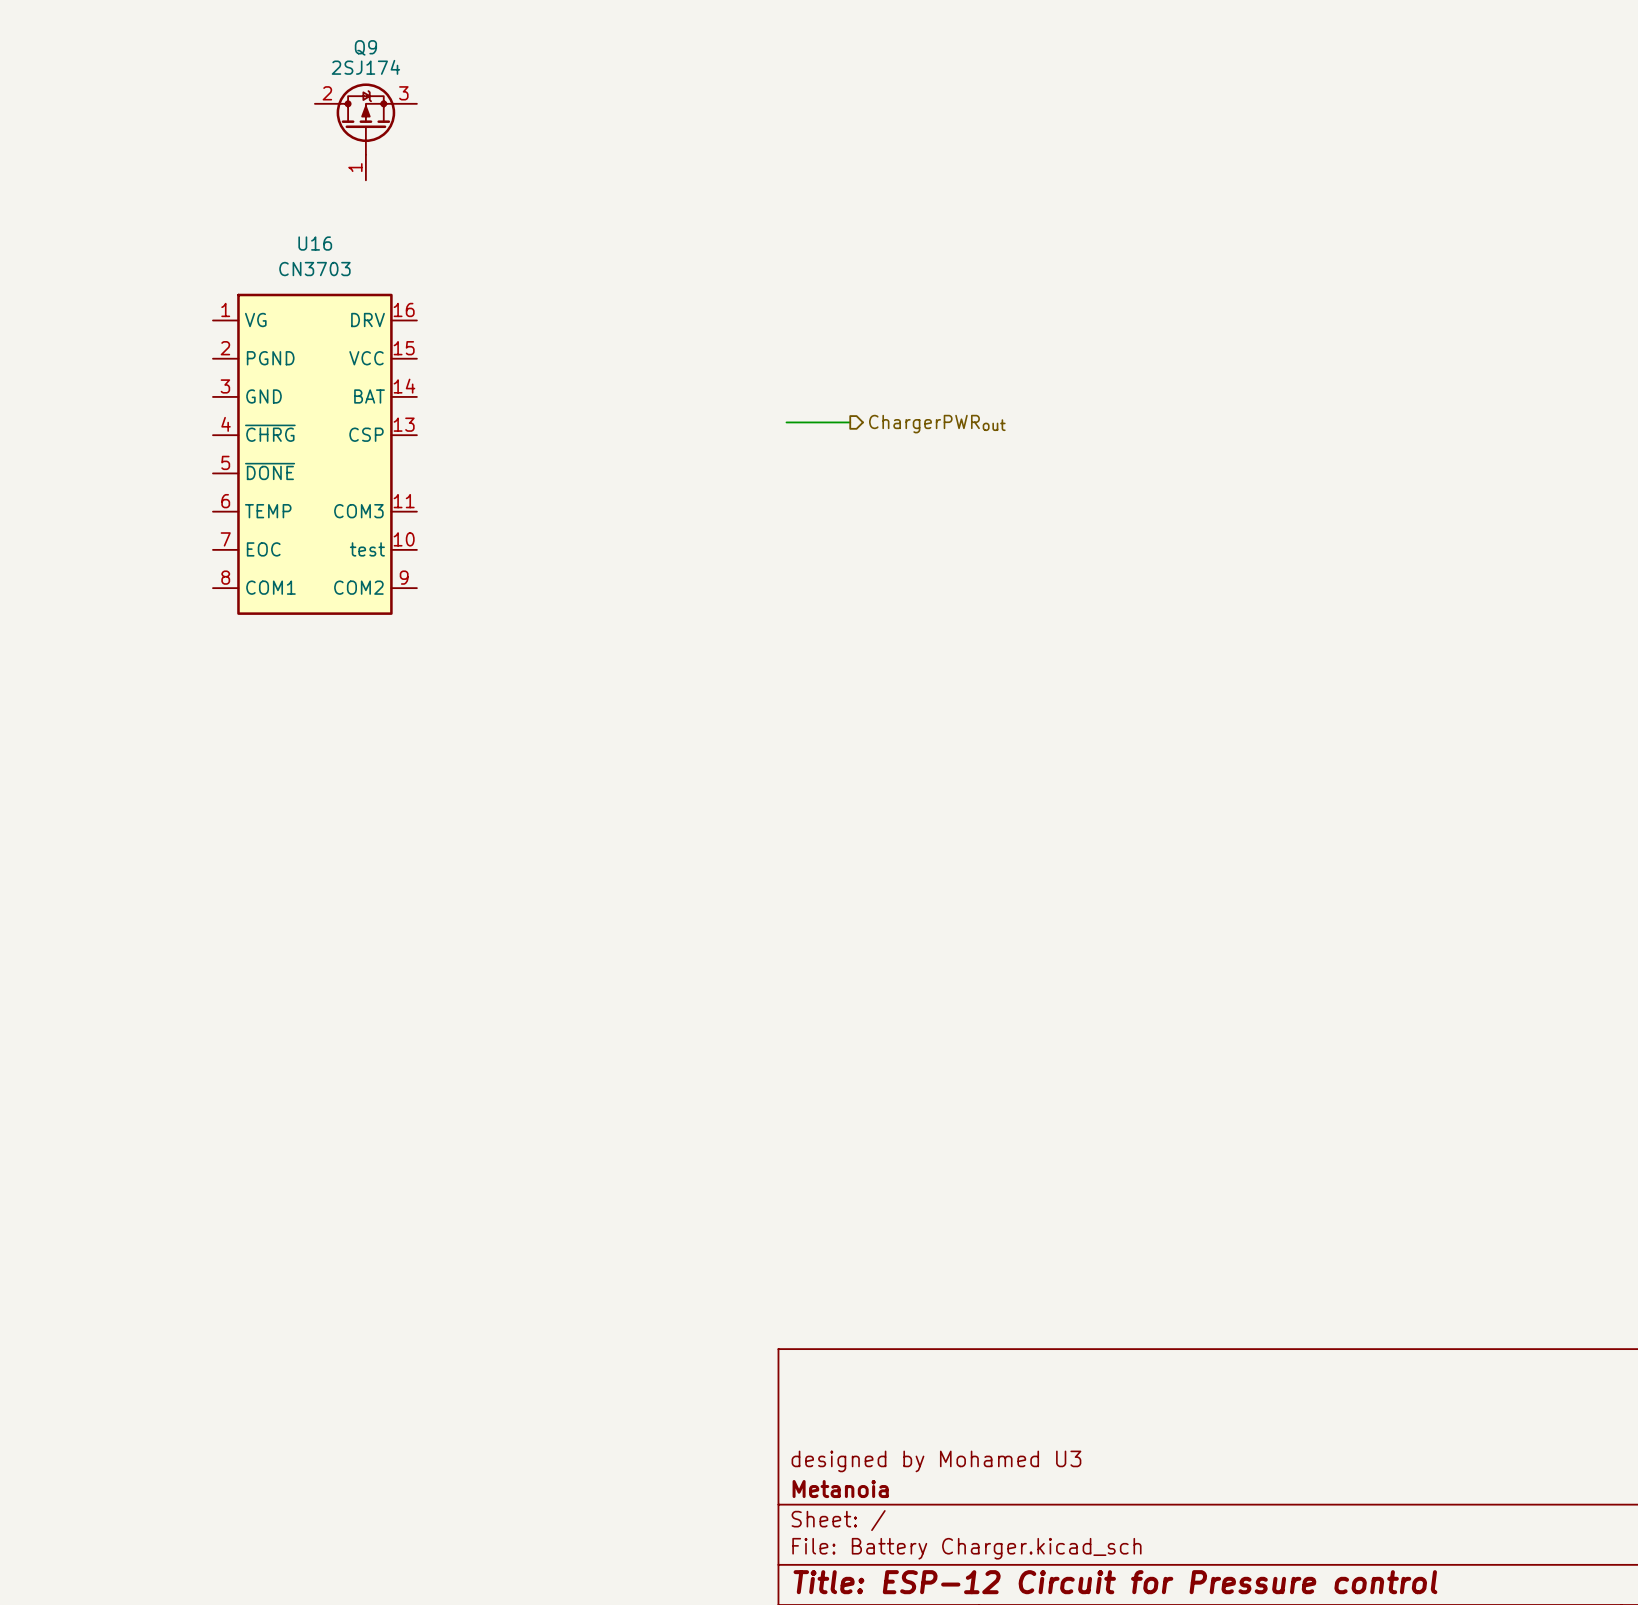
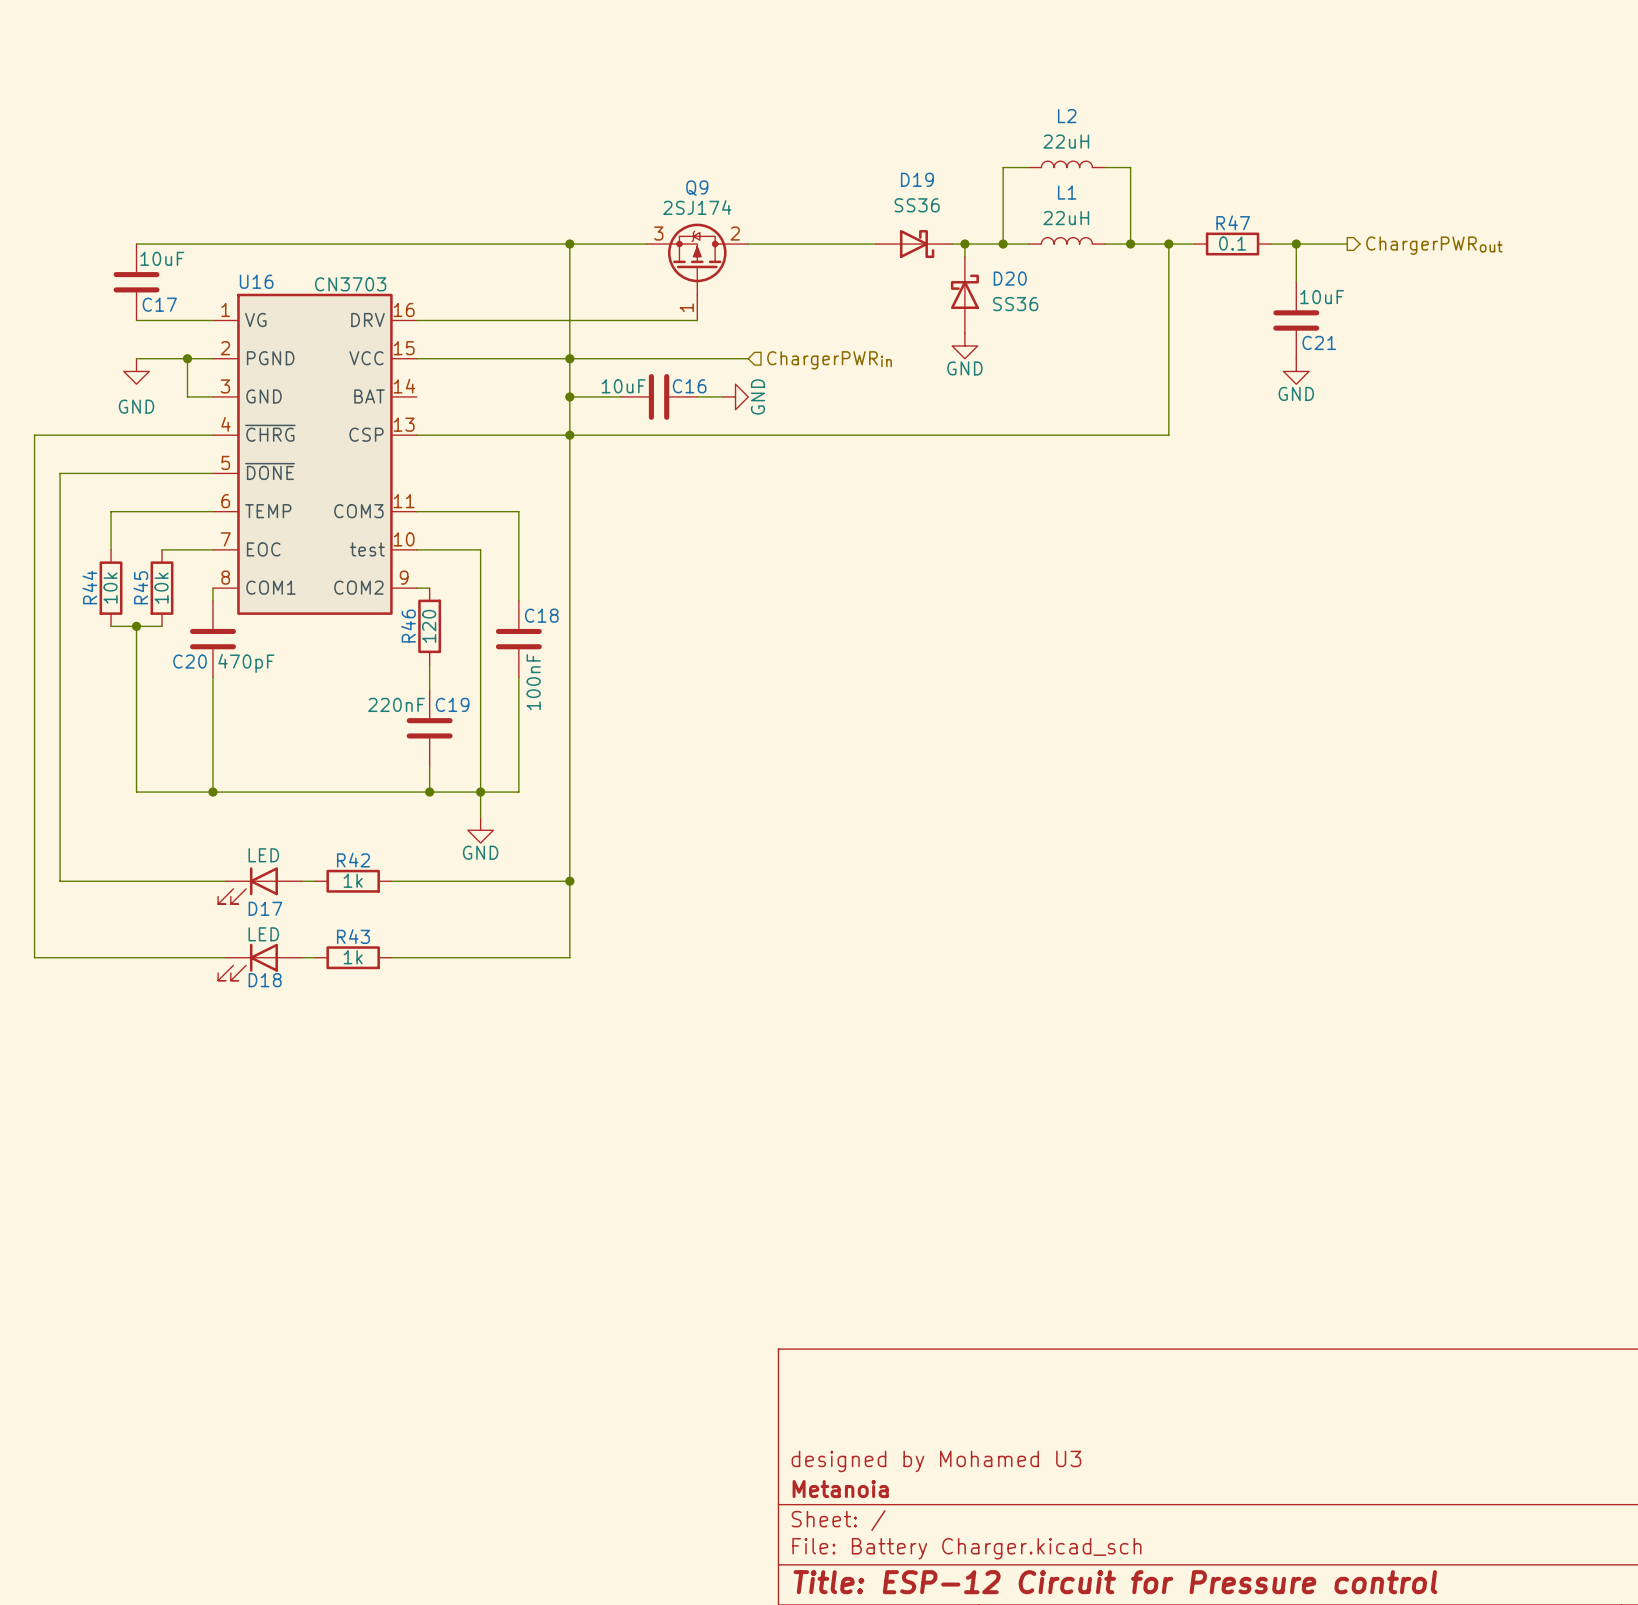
Q9 flip: as is (365, 119) -> left-right (697, 259)
Q9 position: (365, 131) -> (697, 272)
L2: none -> 22uH (1066, 164)
wire: none -> (1028, 167) (1003, 167) (1003, 244)
wire: none -> (1105, 167) (1130, 167) (1130, 244)
L1: none -> 22uH (1066, 240)
U16 name position: U16 (315, 243) -> U16 (256, 281)
wire: none -> (136, 244) (646, 244)
wire: none -> (569, 244) (569, 957) (391, 957)
junction: none -> (569, 244)
wire: none -> (748, 244) (875, 244)
D19: none -> SS36 (913, 244)
wire: none -> (952, 244) (1028, 244)
wire: none -> (964, 244) (964, 256)
junction: none -> (964, 244)
junction: none -> (1003, 244)
wire: none -> (1105, 244) (1194, 244)
junction: none -> (1130, 244)
wire: none -> (1168, 244) (1168, 435) (416, 435)
junction: none -> (1168, 244)
R47: none -> 0.1 (1232, 244)
wire: none -> (1270, 244) (1347, 244)
wire: none -> (1296, 244) (1296, 282)
junction: none -> (1296, 244)
hierarchical label: none -> ChargerPWRout (1434, 245)
U16 value position: CN3703 (314, 269) -> CN3703 (350, 284)
C17: none -> 10uF (136, 282)
D20: none -> SS36 (964, 295)
wire: none -> (136, 320) (212, 320)
wire: none -> (416, 320) (697, 320)
C21: none -> 10uF (1296, 320)
power symbol: none -> GND (964, 345)
wire: none -> (136, 358) (212, 358)
wire: none -> (187, 358) (187, 396) (212, 396)
junction: none -> (187, 358)
wire: none -> (416, 358) (748, 358)
junction: none -> (569, 358)
hierarchical label: none -> ChargerPWRin (829, 360)
power symbol: none -> GND (136, 371)
power symbol: none -> GND (1296, 371)
wire: none -> (569, 396) (620, 396)
junction: none -> (569, 396)
C16: none -> 10uF (659, 396)
wire: none -> (697, 396) (722, 396)
power symbol: none -> GND (735, 396)
wire: (786, 422) (850, 422) -> none
hierarchical label: ChargerPWRout (937, 424) -> none
wire: none -> (212, 435) (34, 435) (34, 957) (225, 957)
junction: none -> (569, 435)
wire: none -> (212, 473) (60, 473) (60, 881) (225, 881)
wire: none -> (212, 511) (111, 511) (111, 549)
wire: none -> (416, 511) (518, 511) (518, 600)
wire: none -> (162, 549) (212, 549)
wire: none -> (416, 549) (480, 549) (480, 817)
R44: none -> 10k (111, 588)
R45: none -> 10k (162, 588)
wire: none -> (212, 588) (212, 600)
wire: none -> (416, 588) (429, 588)
wire: none -> (111, 626) (162, 626)
wire: none -> (136, 626) (136, 792) (518, 792) (518, 677)
junction: none -> (136, 626)
R46: none -> 120 (429, 626)
C20: none -> 470pF (212, 639)
C18: none -> 100nF (518, 639)
wire: none -> (429, 664) (429, 690)
wire: none -> (212, 677) (212, 792)
C19: none -> 220nF (429, 728)
wire: none -> (429, 766) (429, 792)
junction: none -> (212, 792)
junction: none -> (429, 792)
junction: none -> (480, 792)
power symbol: none -> GND (480, 830)
wire: none -> (302, 881) (314, 881)
R42: none -> 1k (353, 881)
wire: none -> (391, 881) (569, 881)
junction: none -> (569, 881)
D17: none -> LED (260, 885)
wire: none -> (302, 957) (314, 957)
R43: none -> 1k (353, 957)
D18: none -> LED (260, 962)

